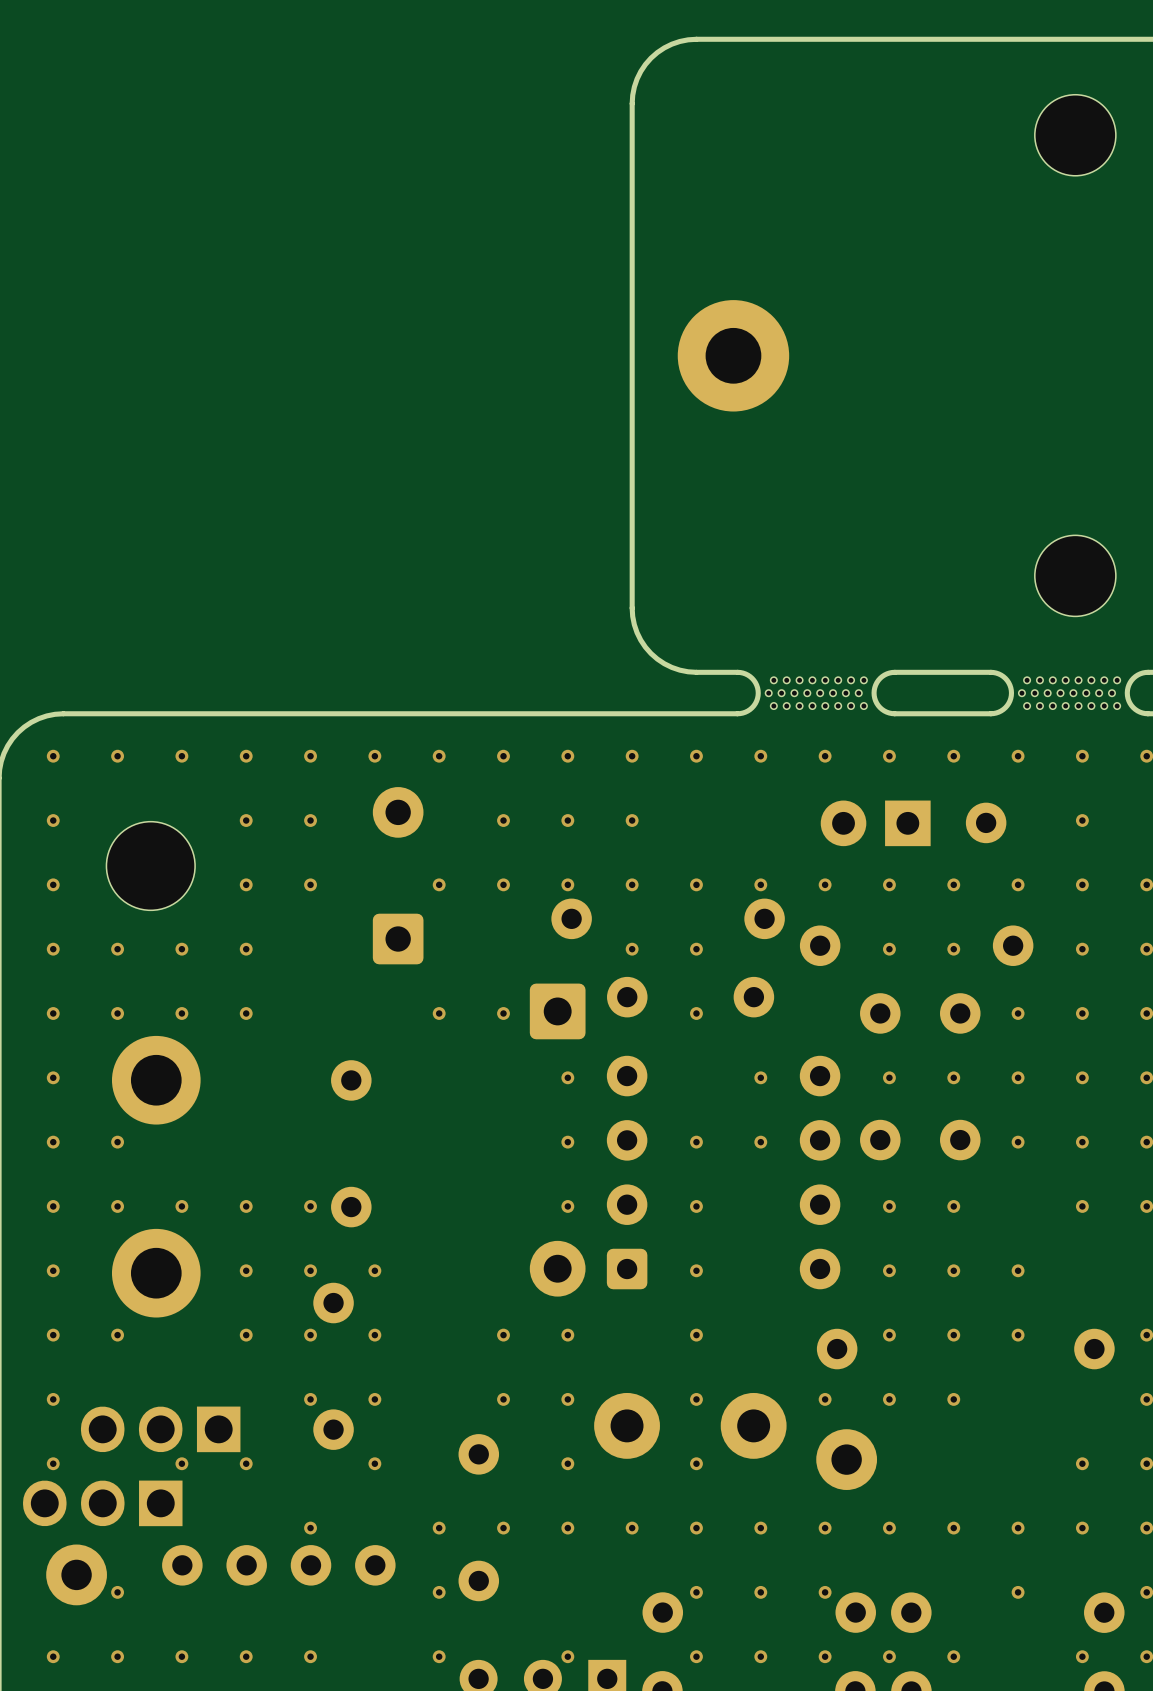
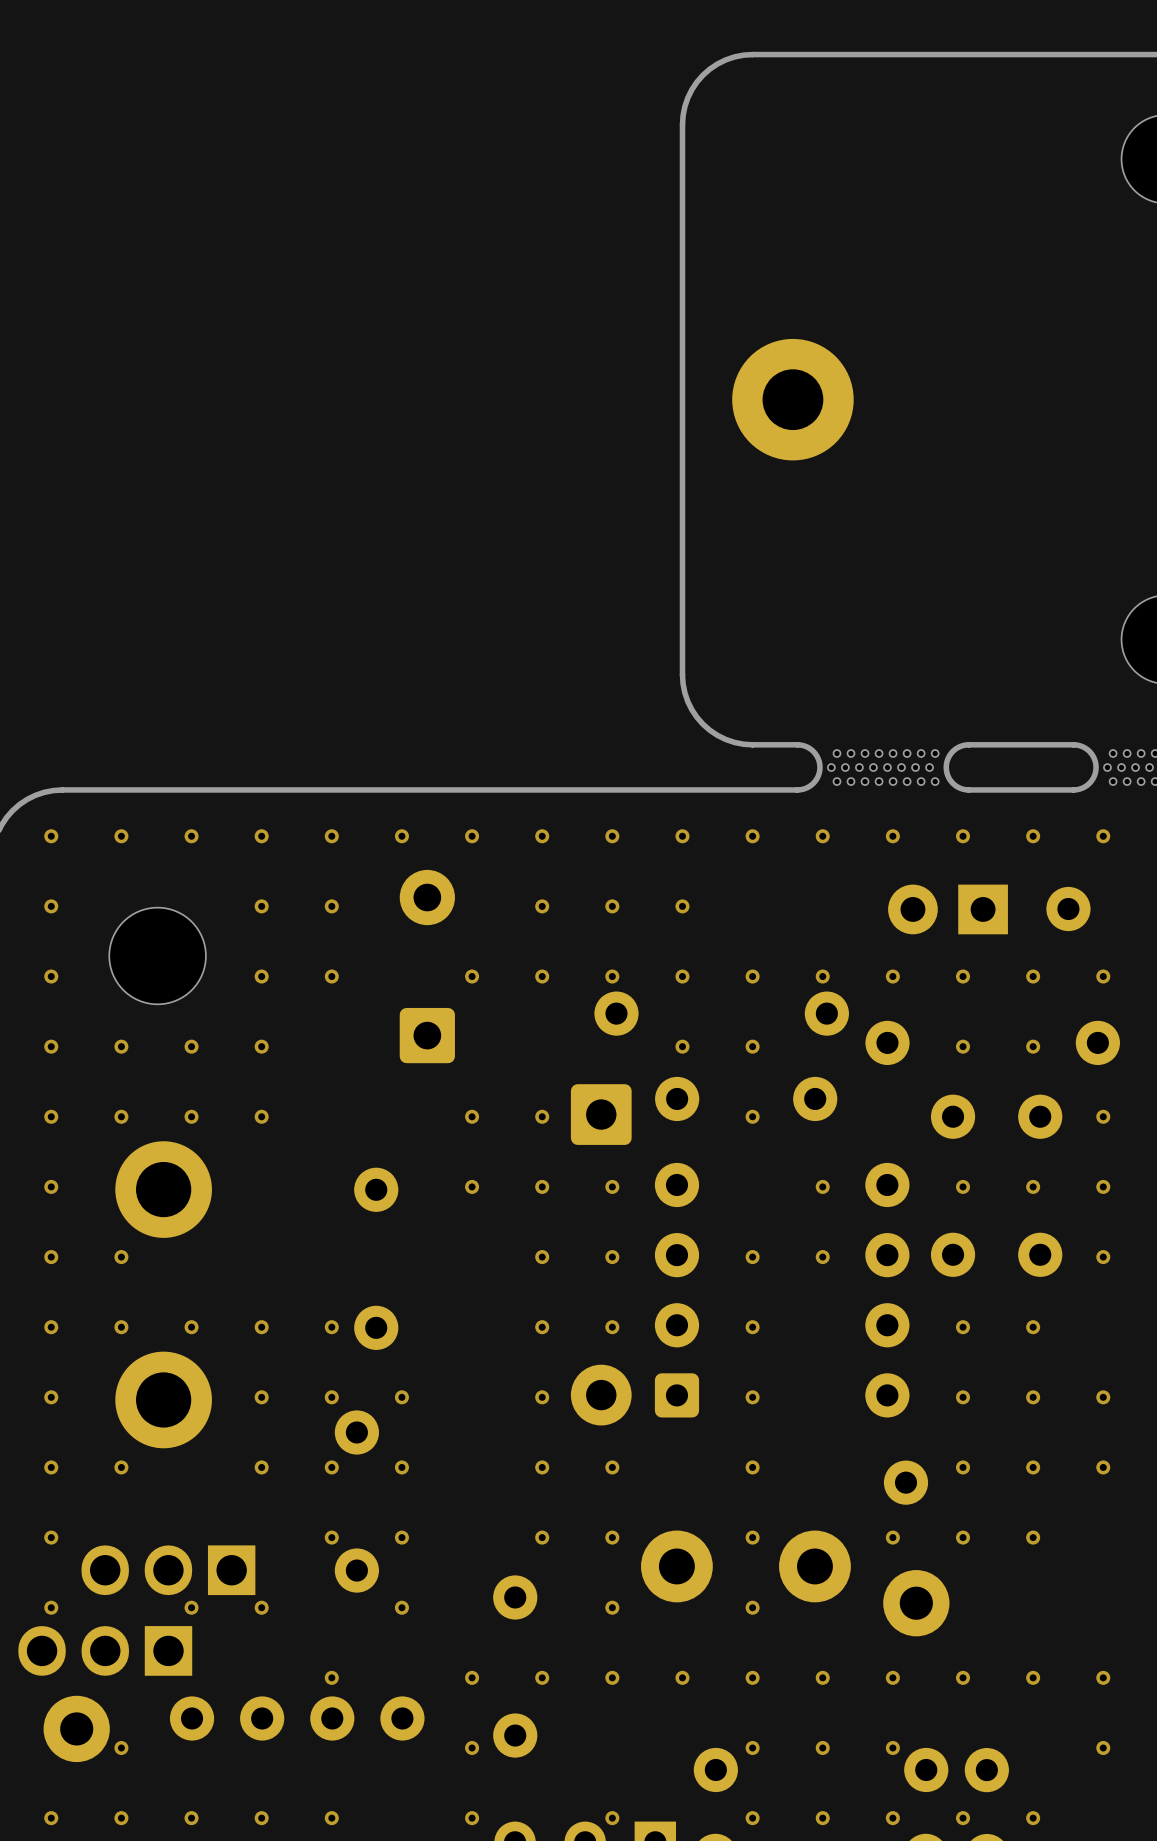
via: none -> (472, 1186)
via: none -> (542, 1186)
via: none -> (542, 1257)
via: none -> (542, 1327)
via: none -> (542, 1397)

